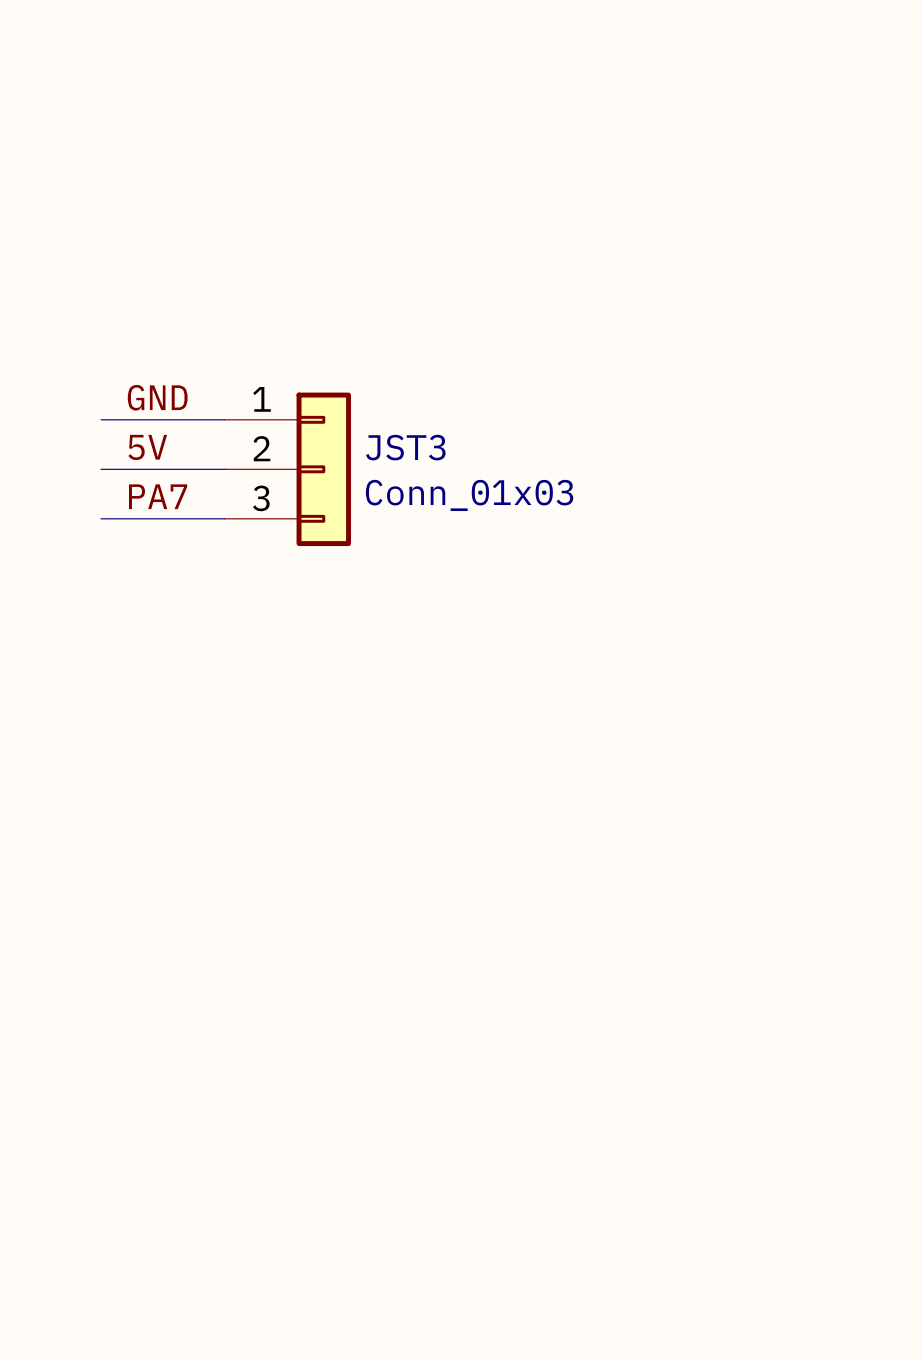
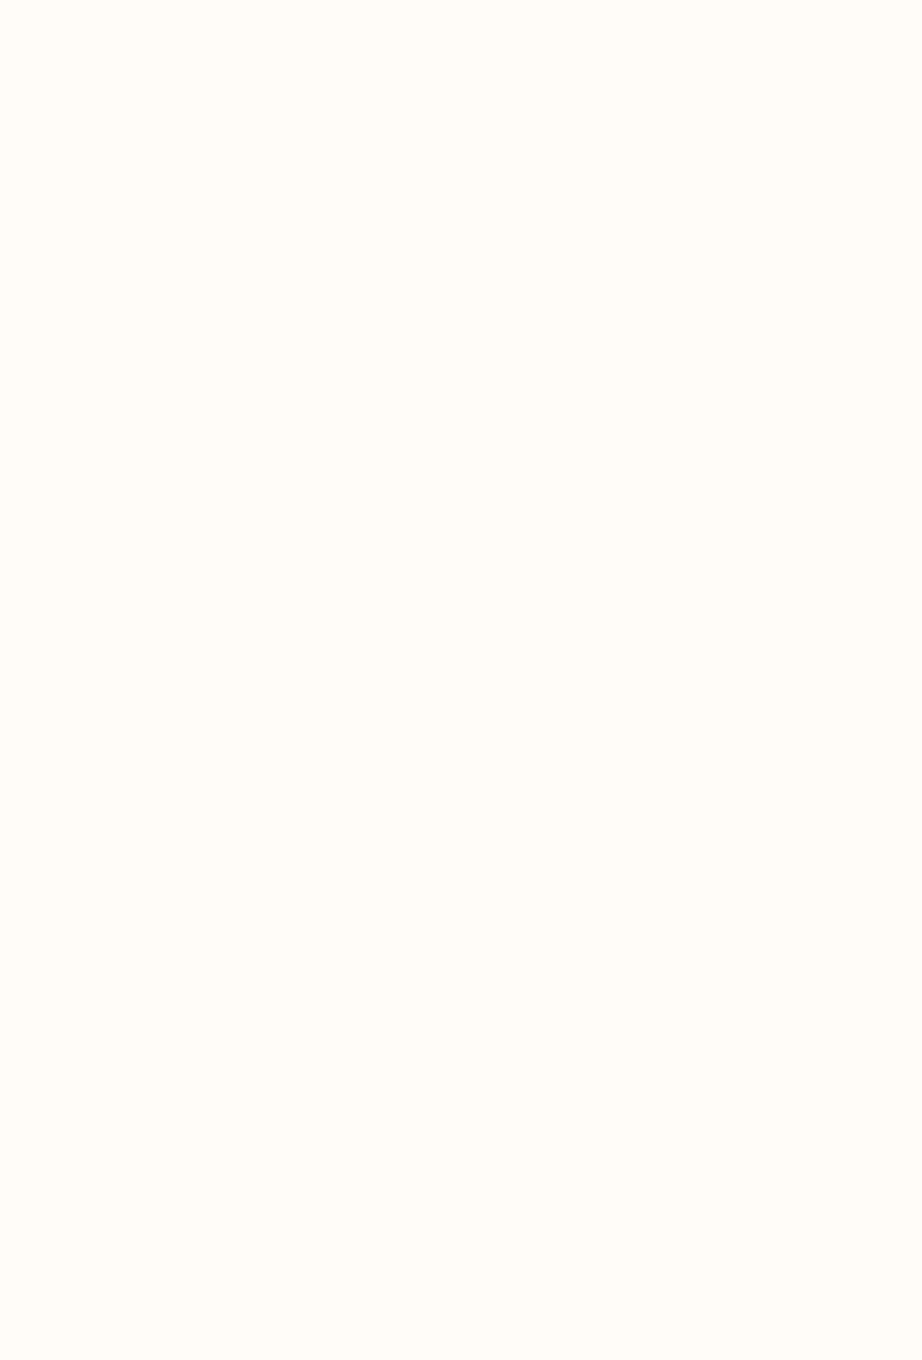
label: GND (157, 397) -> none
wire: (101, 419) (224, 419) -> none
label: 5V (147, 447) -> none
wire: (101, 469) (224, 469) -> none
JST3: Conn_01x03 (287, 469) -> none
label: PA7 (158, 496) -> none
wire: (101, 518) (224, 518) -> none

